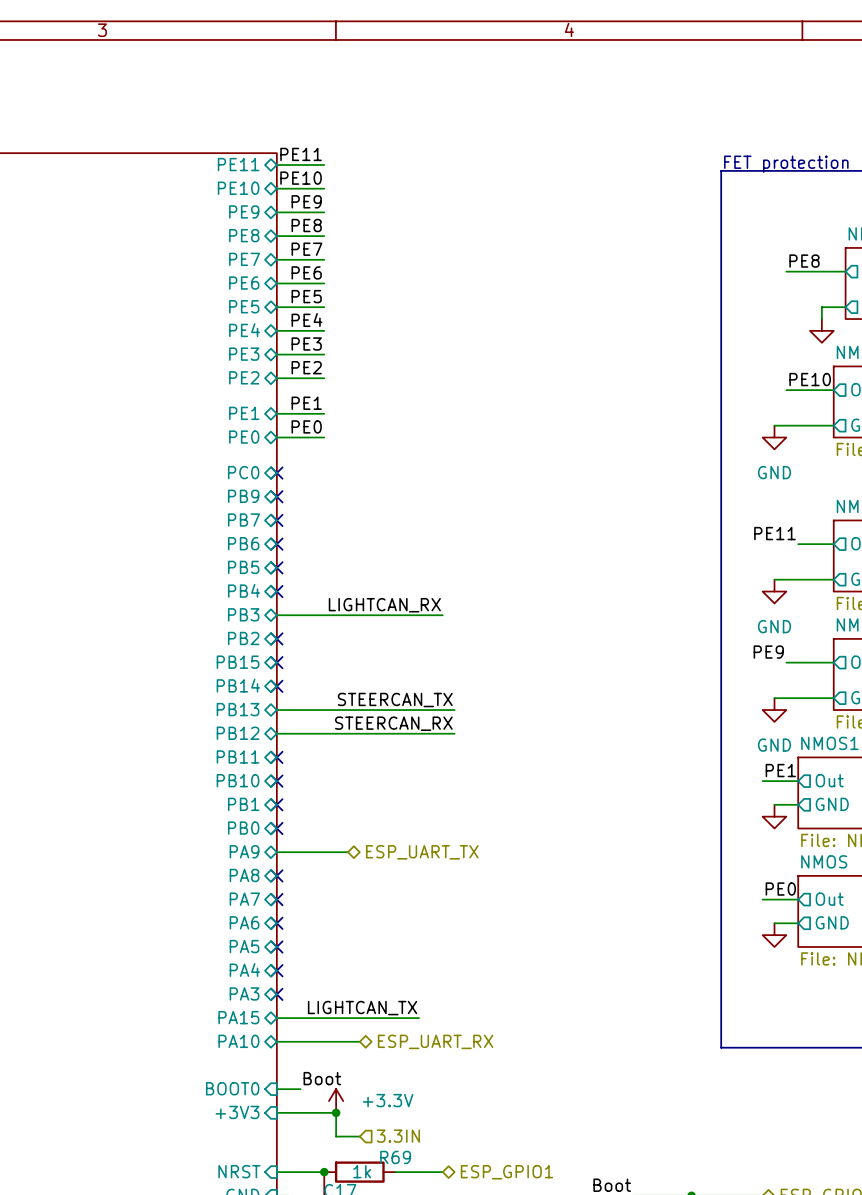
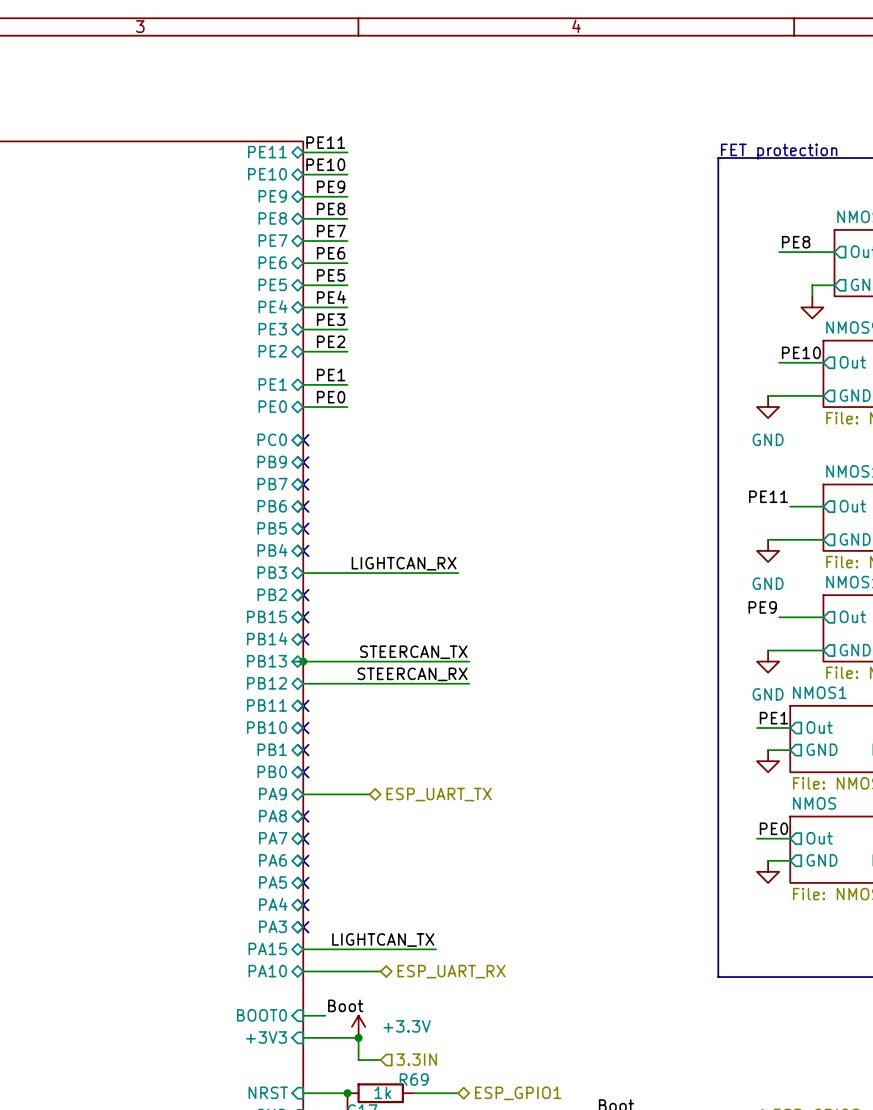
wire: none -> (292, 661) (303, 661)
junction: none -> (303, 661)

